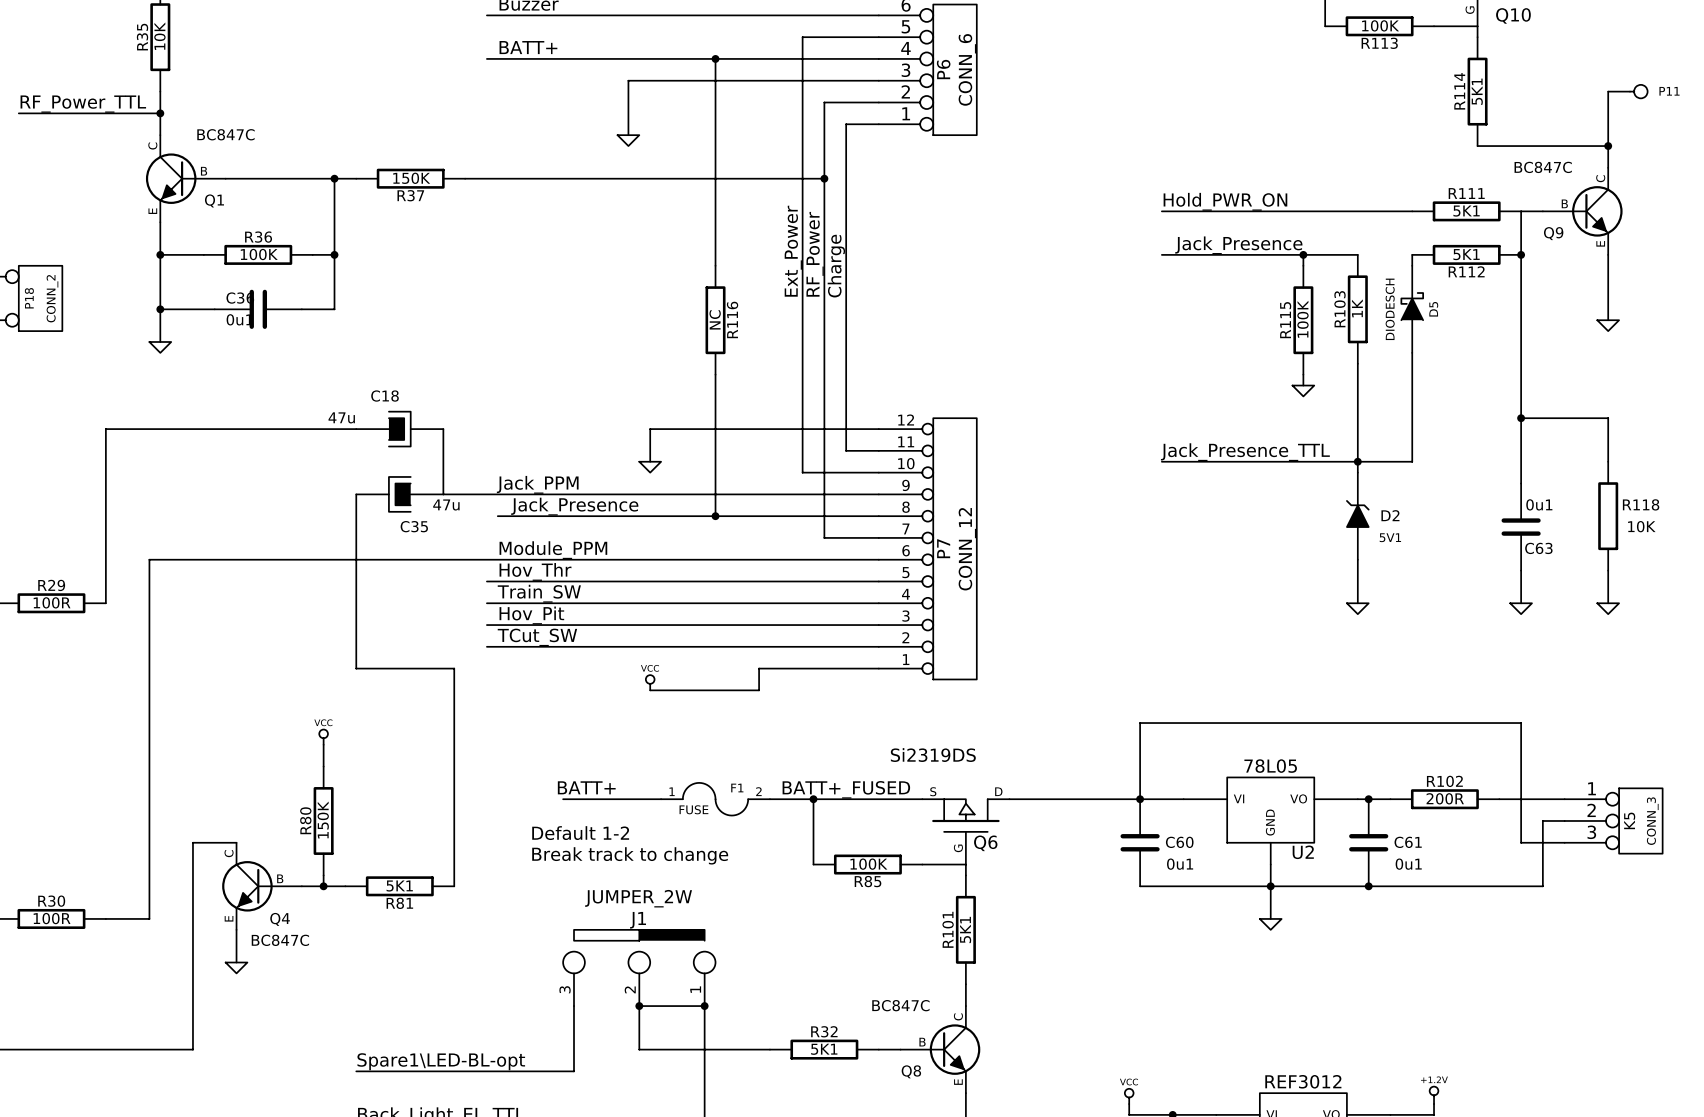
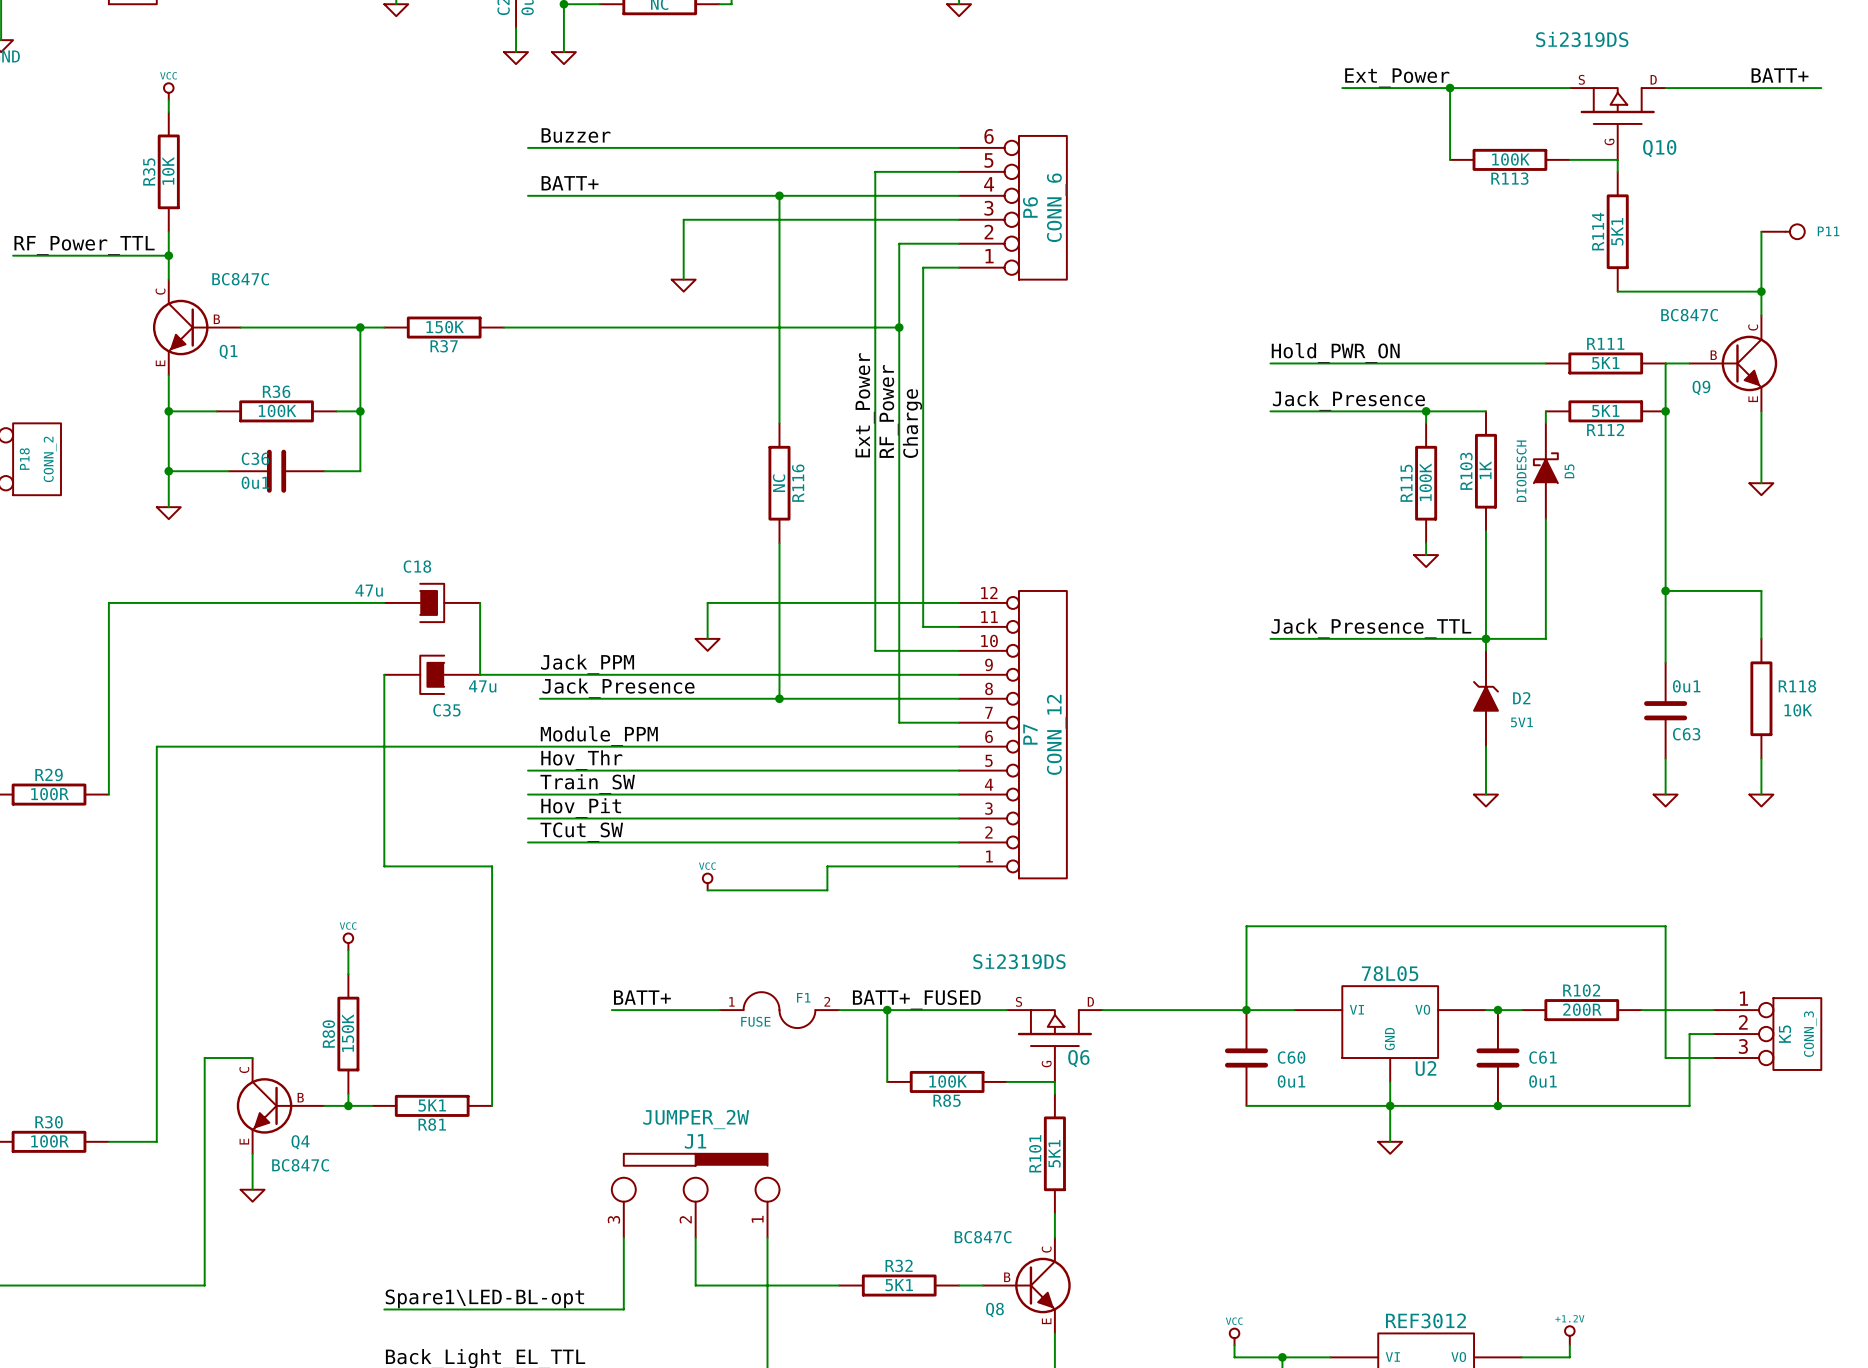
text: Default 1-2 (580, 833) -> none
text: Break track to change (630, 855) -> none
wire: (639, 1006) (704, 1006) -> none
junction: (639, 1006) -> none
junction: (704, 1006) -> none

